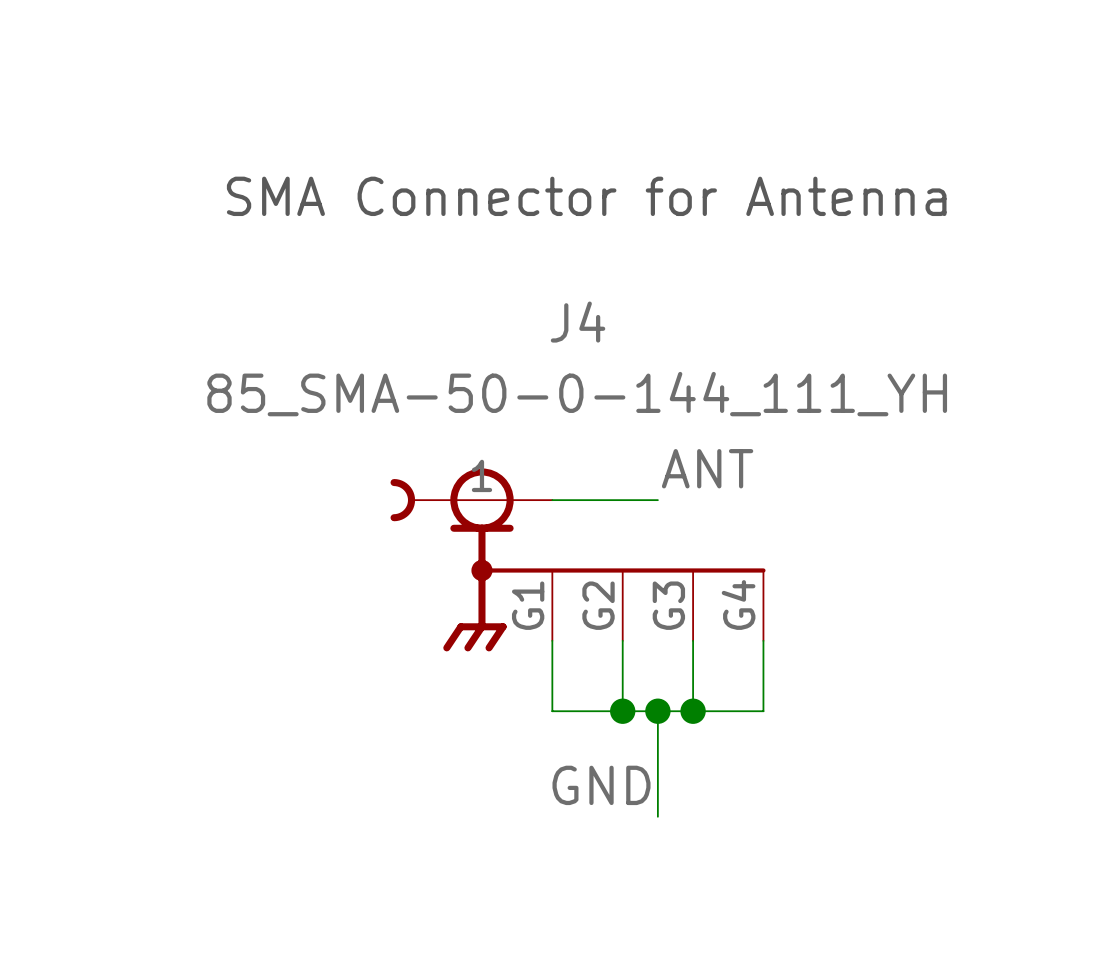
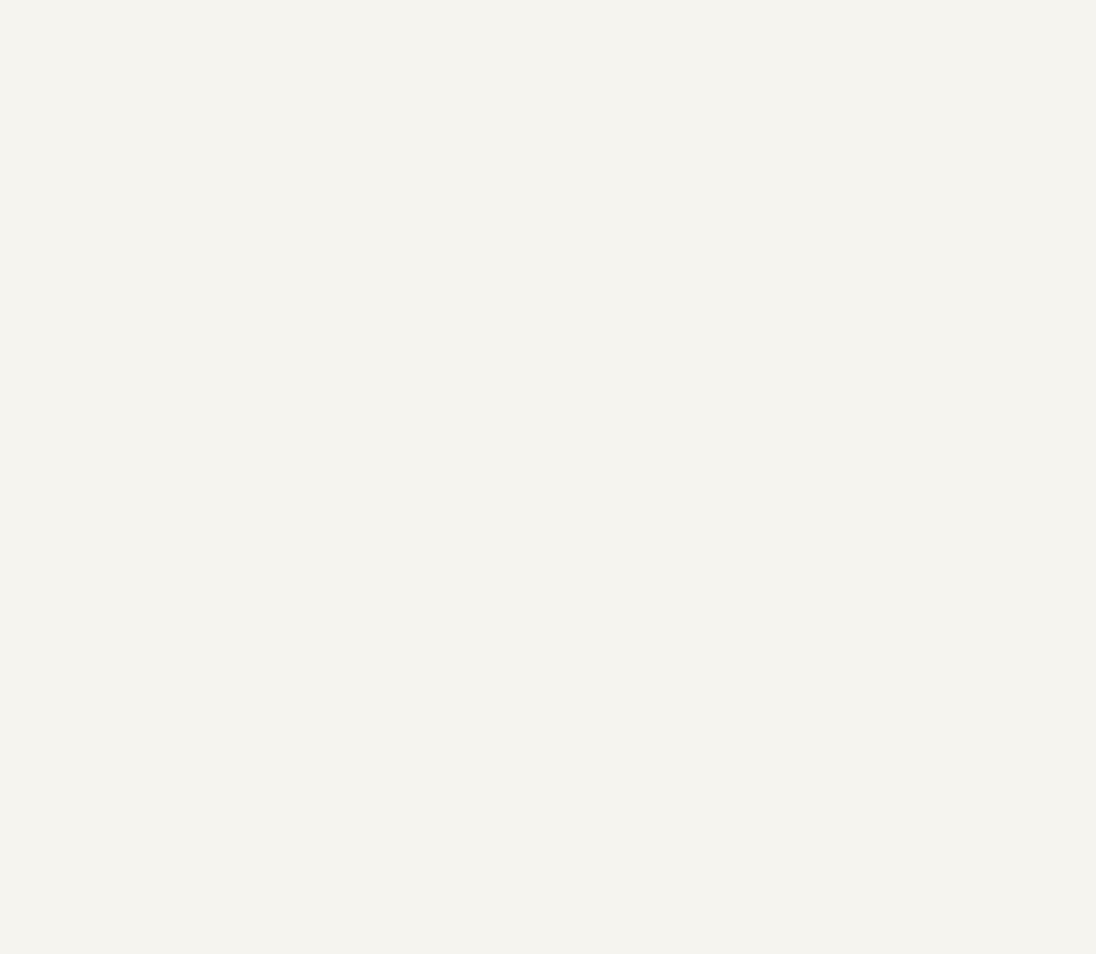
text: SMA Connector for Antenna (586, 196) -> none
label: ANT (707, 468) -> none
wire: (552, 500) (657, 500) -> none
J4: 85_SMA-50-0-144_111_YH (578, 559) -> none
wire: (552, 640) (552, 711) (763, 711) (763, 640) -> none
wire: (622, 640) (622, 711) -> none
wire: (693, 640) (693, 711) -> none
junction: (622, 711) -> none
wire: (657, 711) (657, 816) -> none
junction: (657, 711) -> none
junction: (693, 711) -> none
label: GND (601, 785) -> none

